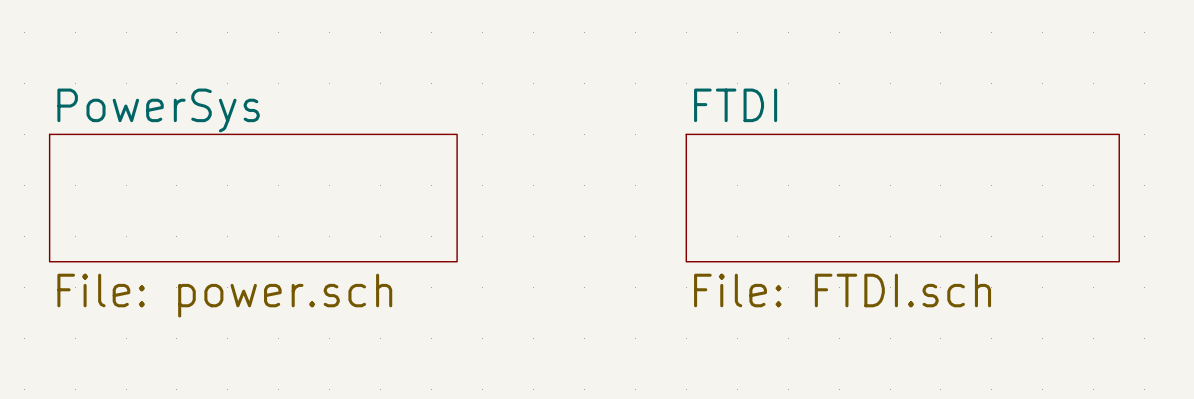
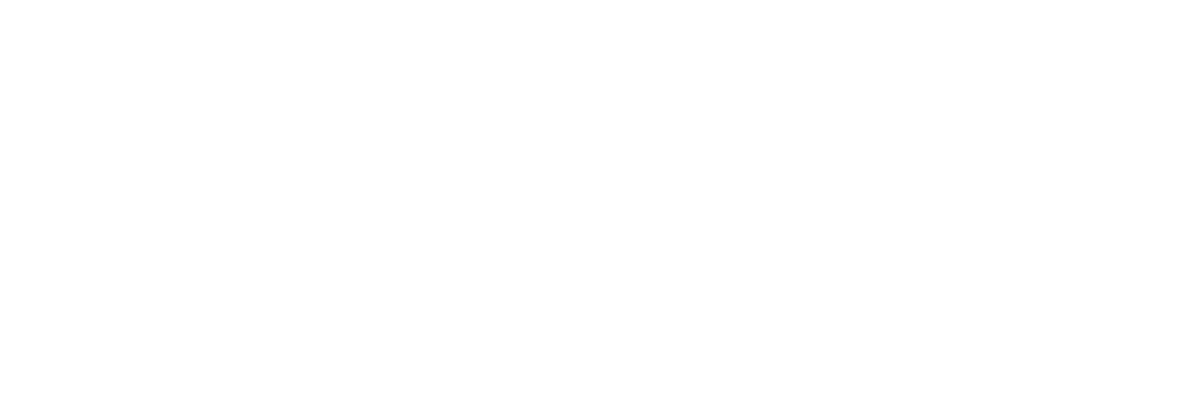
sheet PowerSys: File: power.sch (253, 198) -> none
sheet FTDI: File: FTDI.sch (902, 198) -> none

